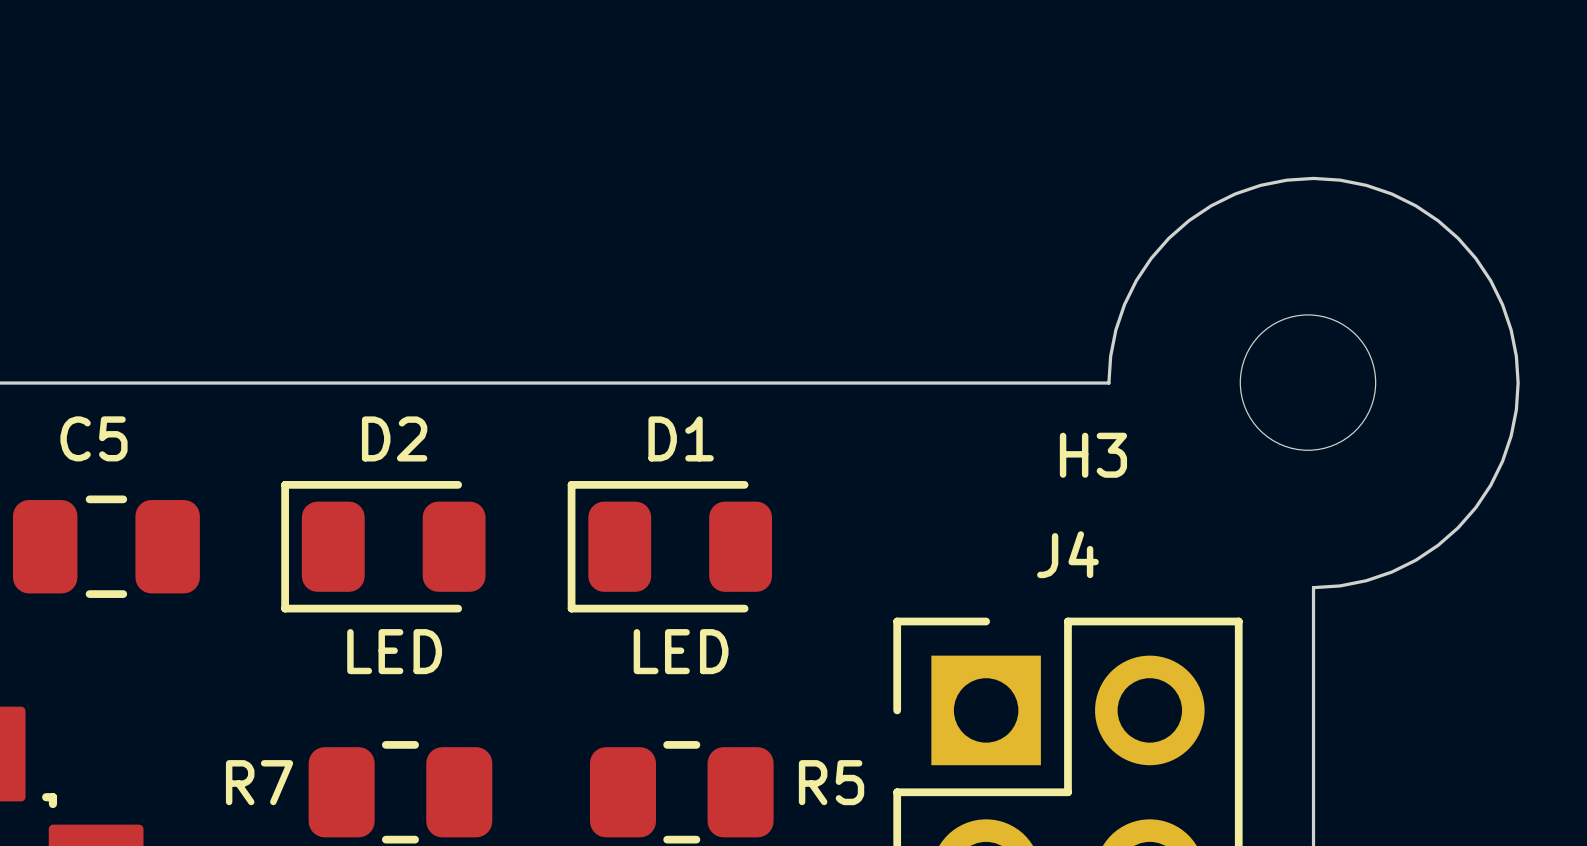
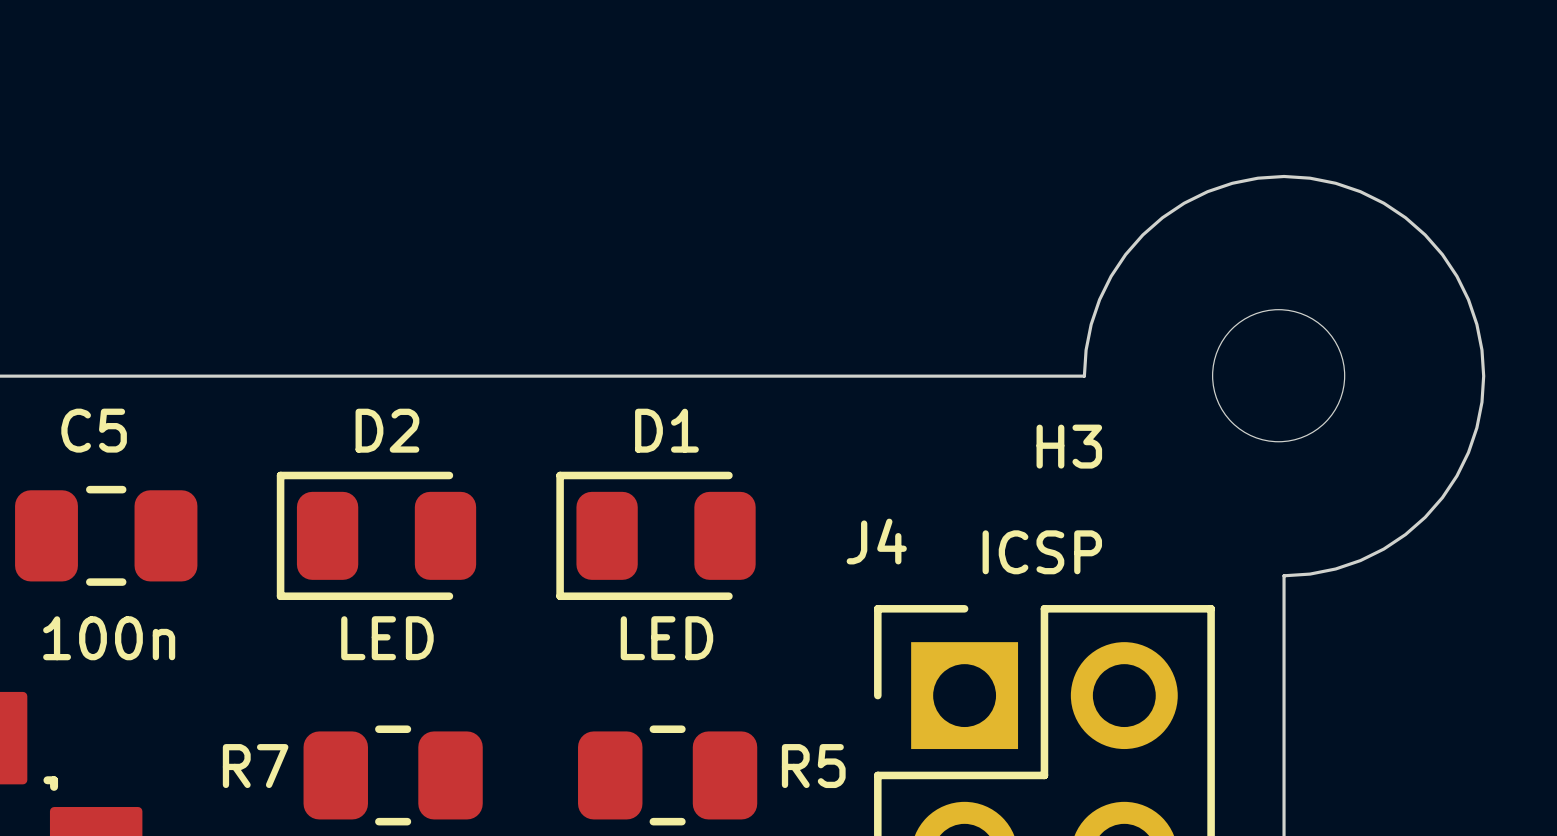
J4 name position: J4 (1067, 554) -> J4 (876, 541)
text: none -> ICSP (1042, 552)
C5 value: none -> 100n (109, 638)

